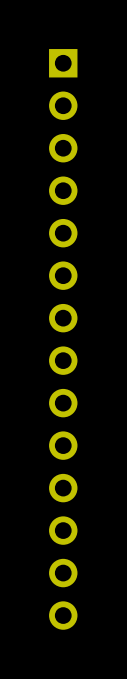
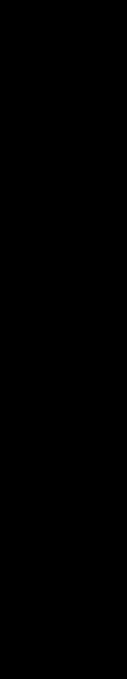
part: (63, 339) -> none

